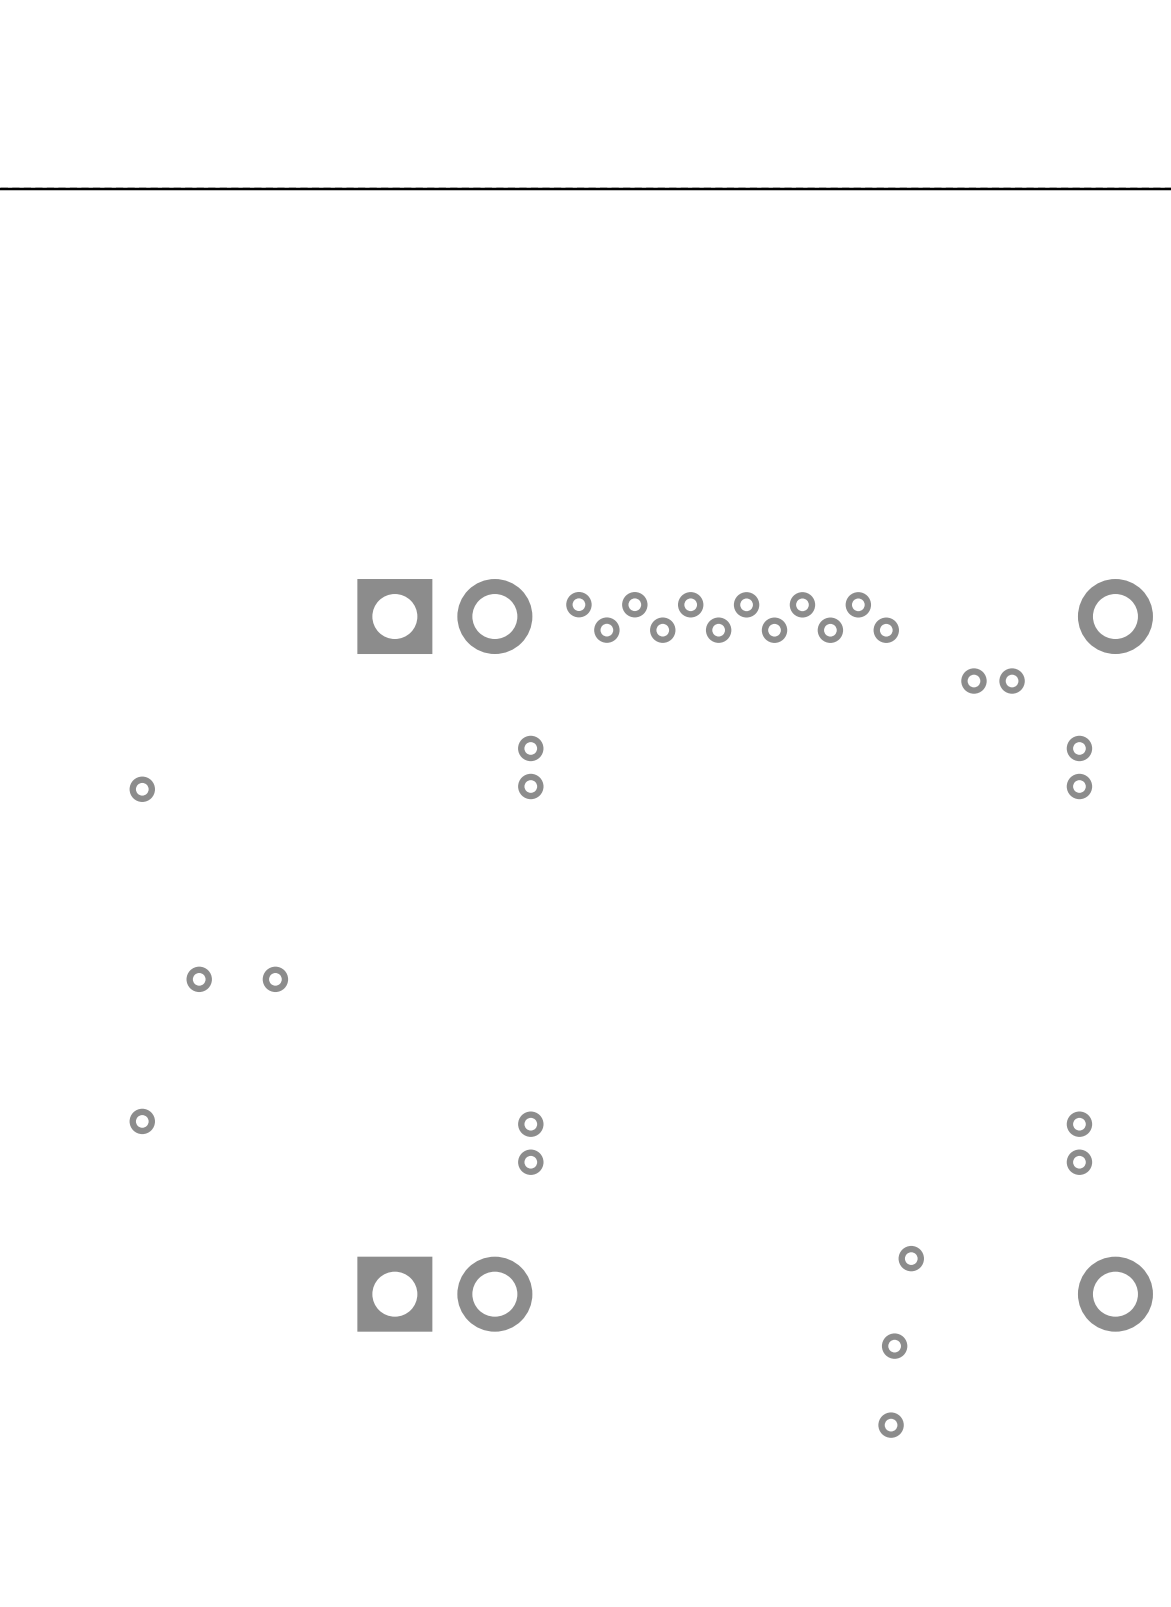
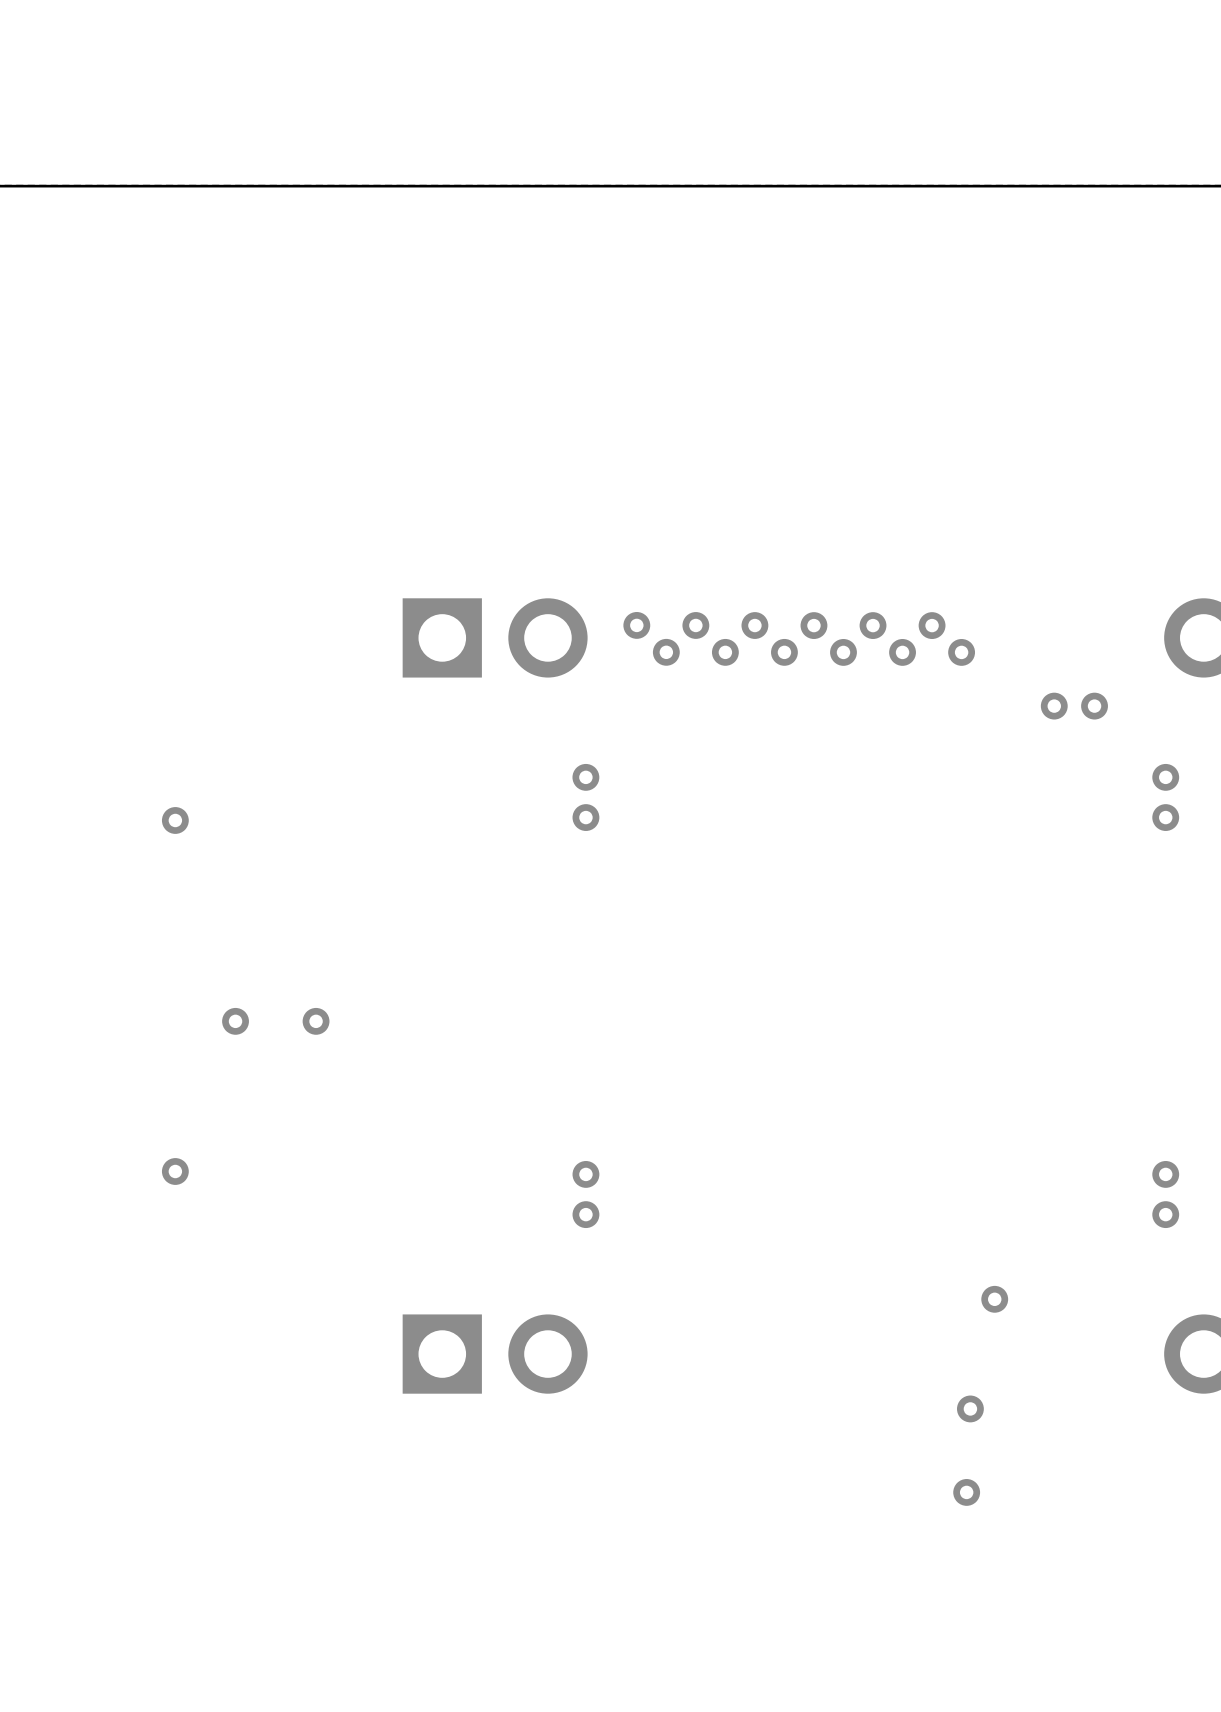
via position: (911, 1258) -> (994, 1299)

